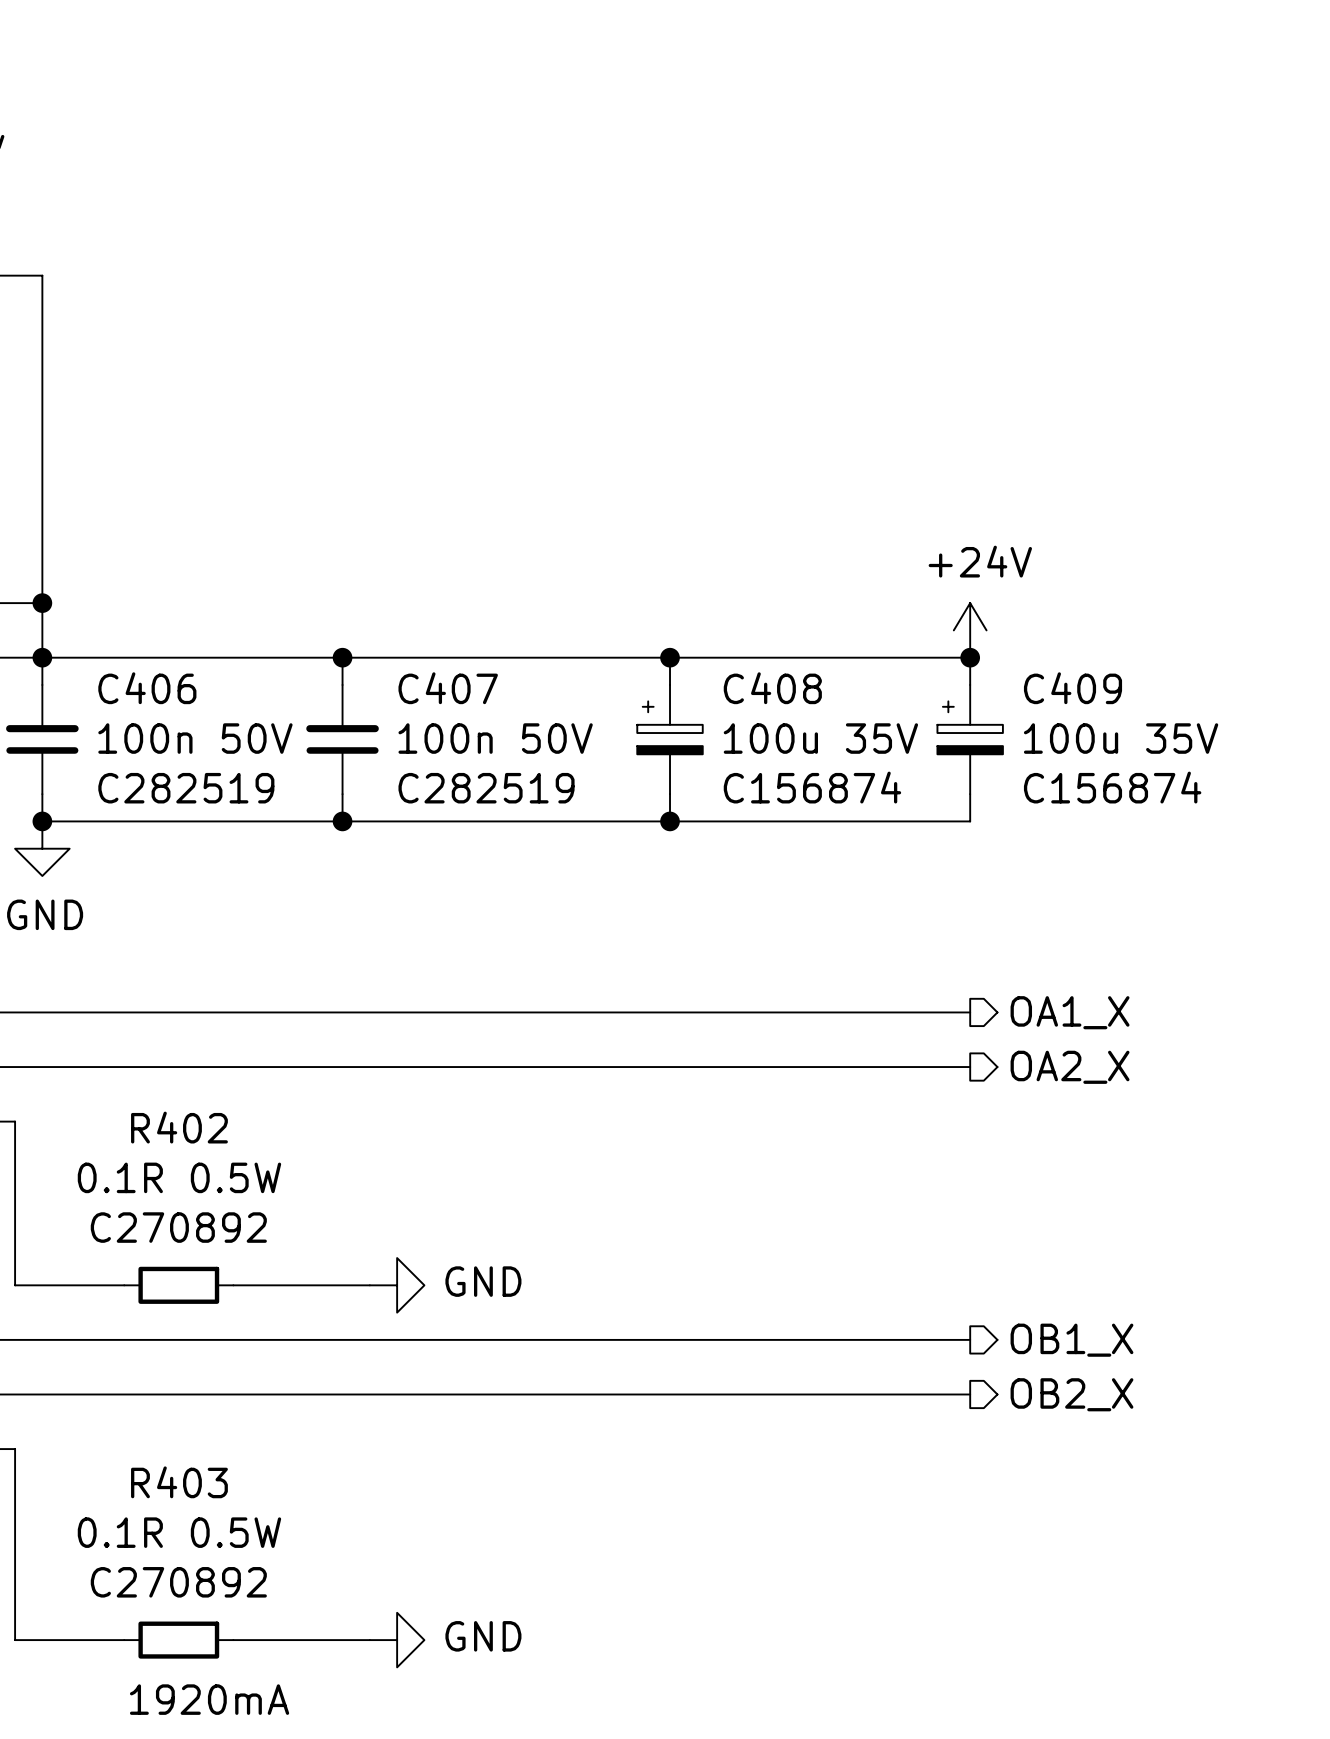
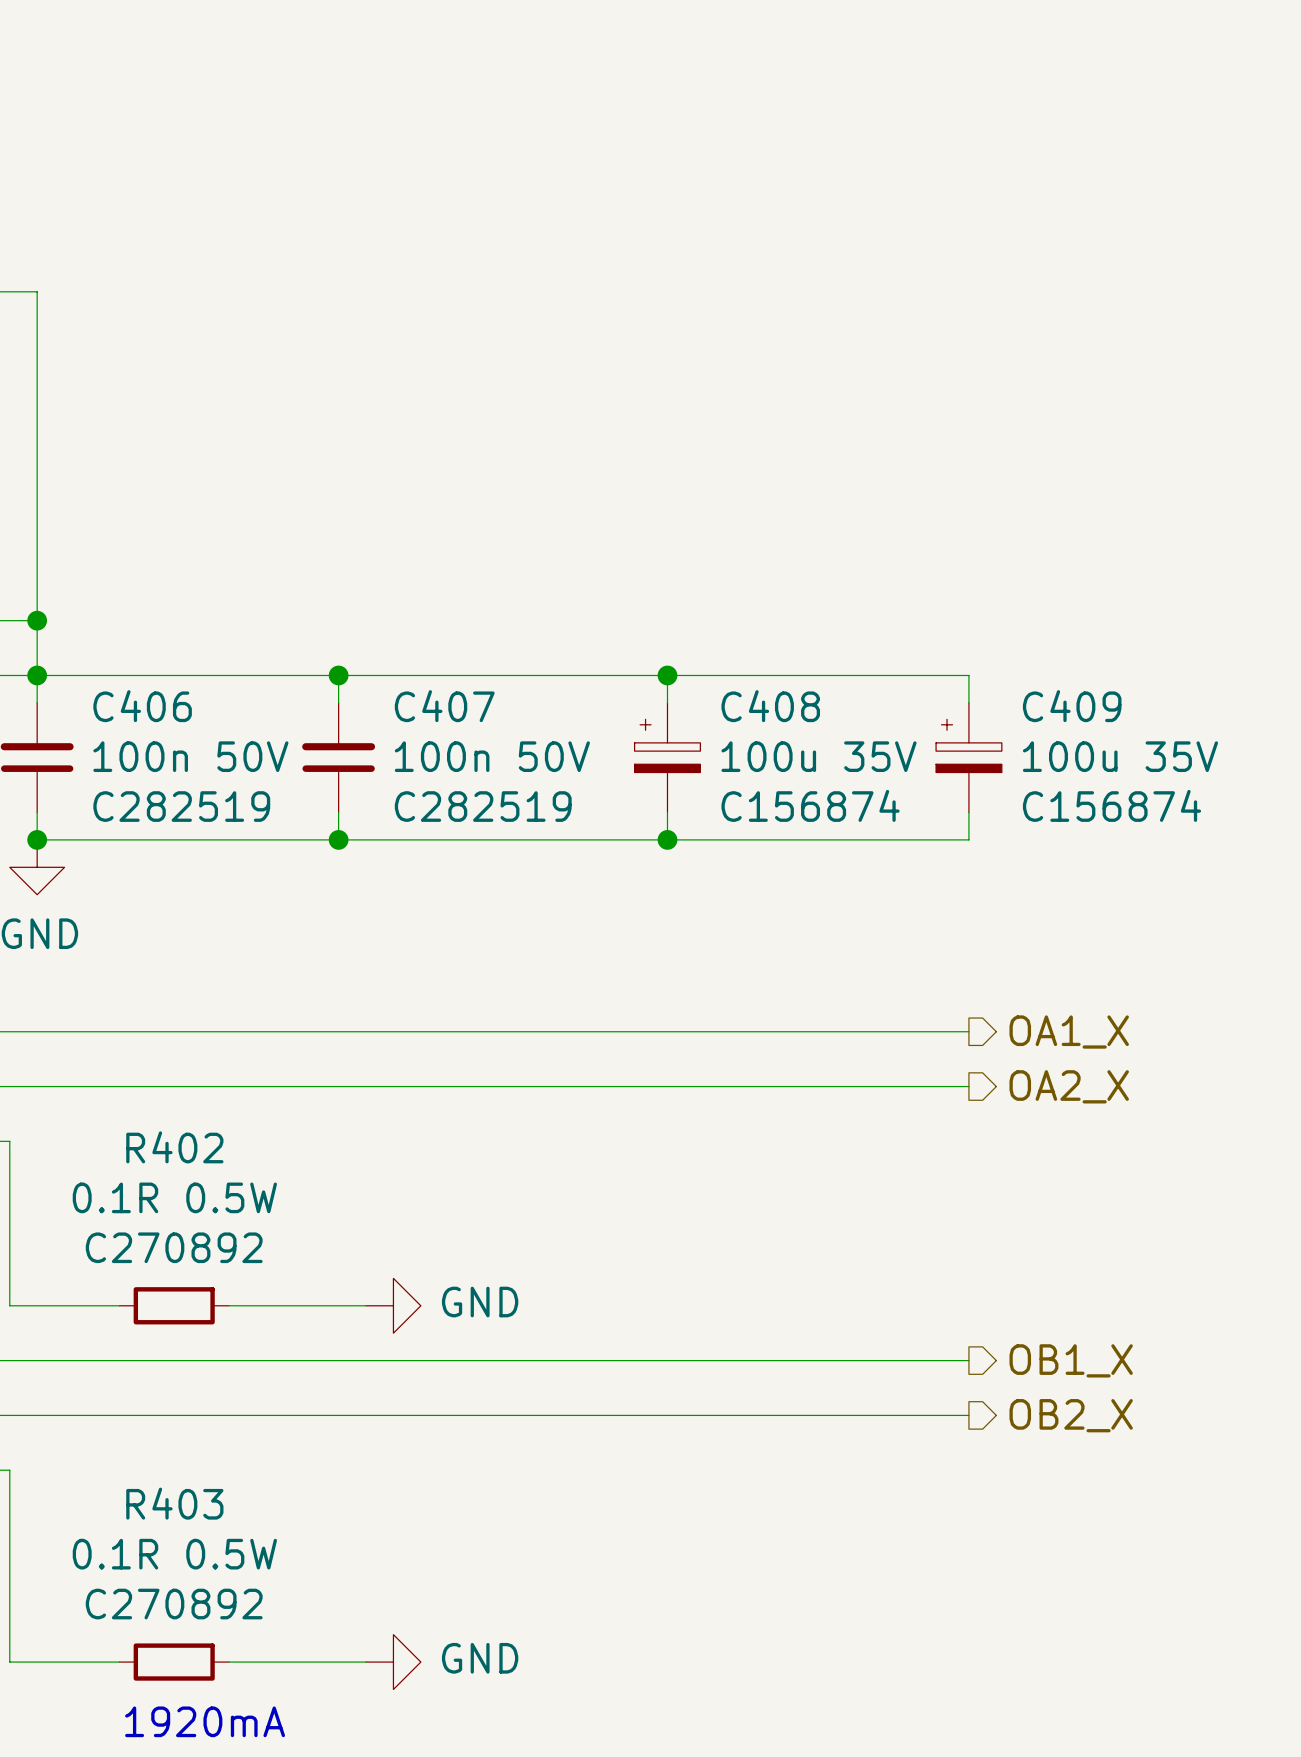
power symbol: +24V (970, 630) -> none
junction: (970, 657) -> none

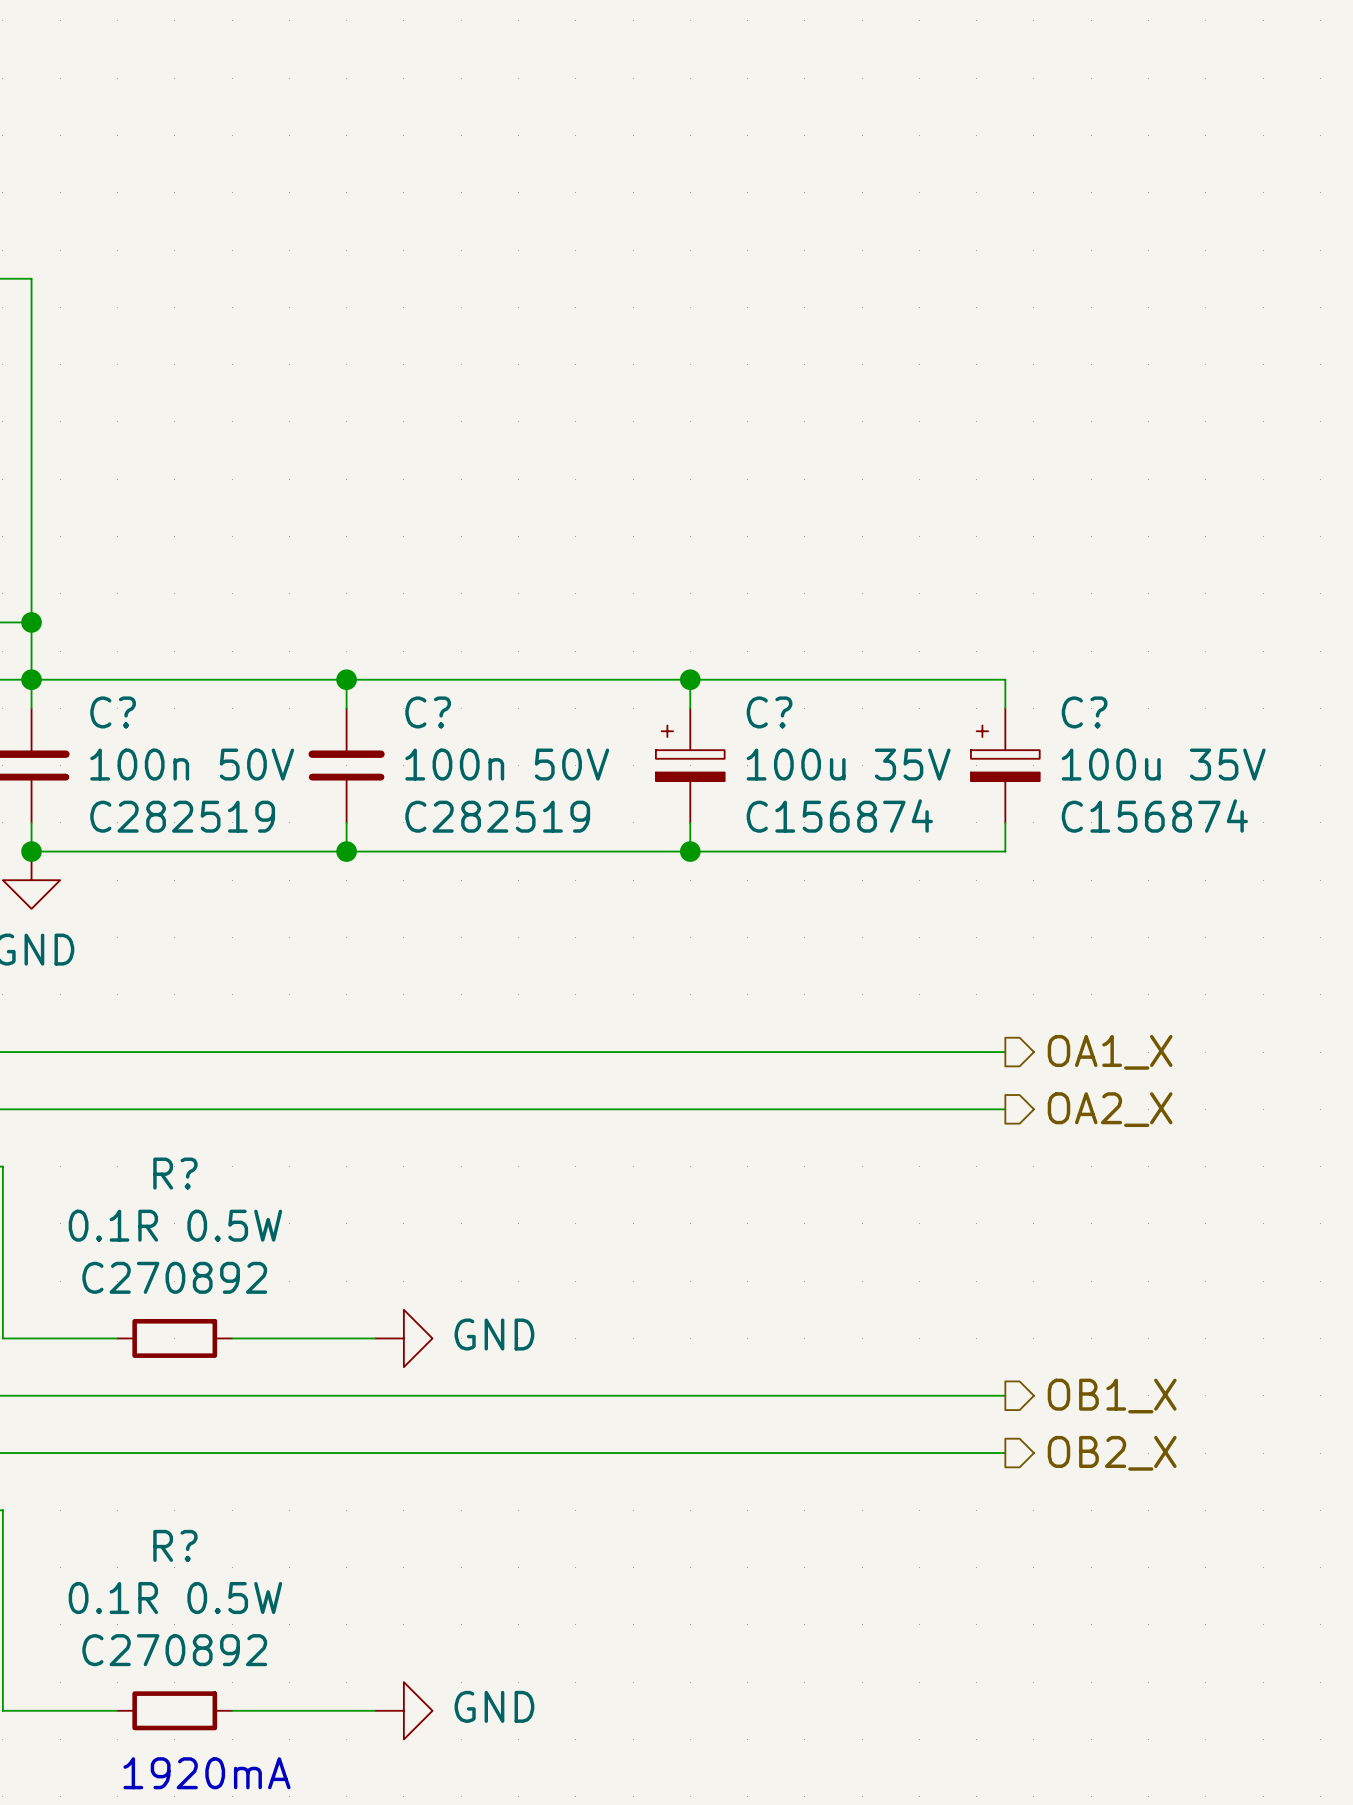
C406 name: C406 (142, 706) -> C? (113, 712)
C407 name: C407 (444, 706) -> C? (428, 712)
C408 name: C408 (770, 706) -> C? (769, 712)
C409 name: C409 (1072, 706) -> C? (1084, 712)
R402 name: R402 (174, 1147) -> R? (175, 1173)
R403 name: R403 (174, 1503) -> R? (175, 1545)

